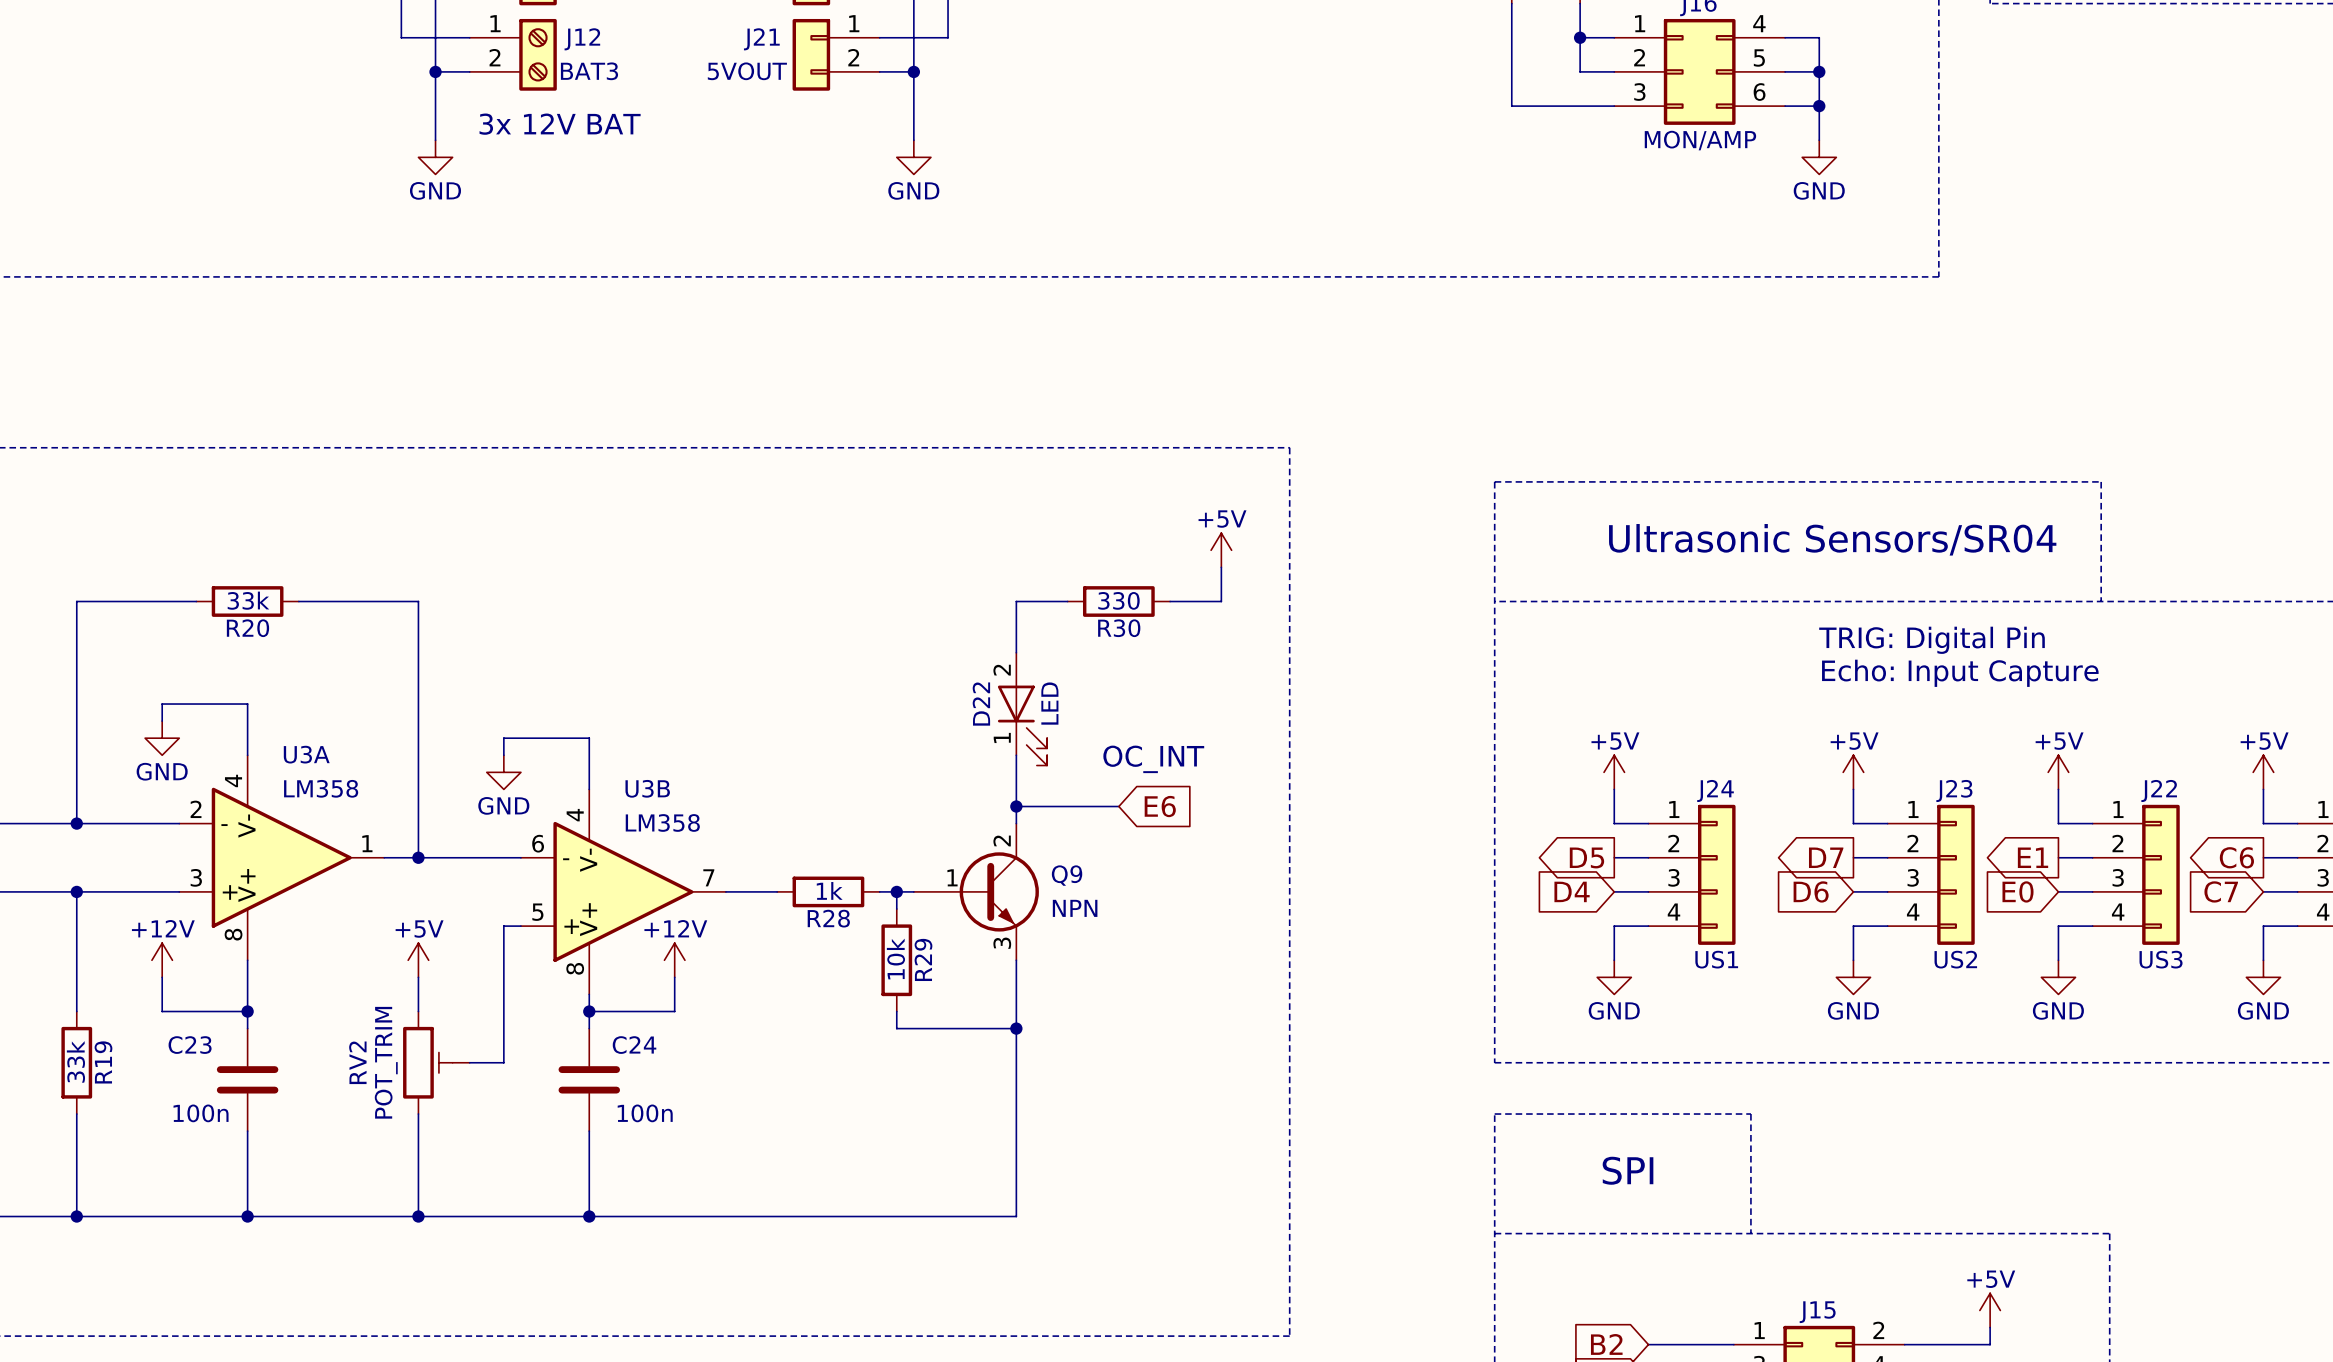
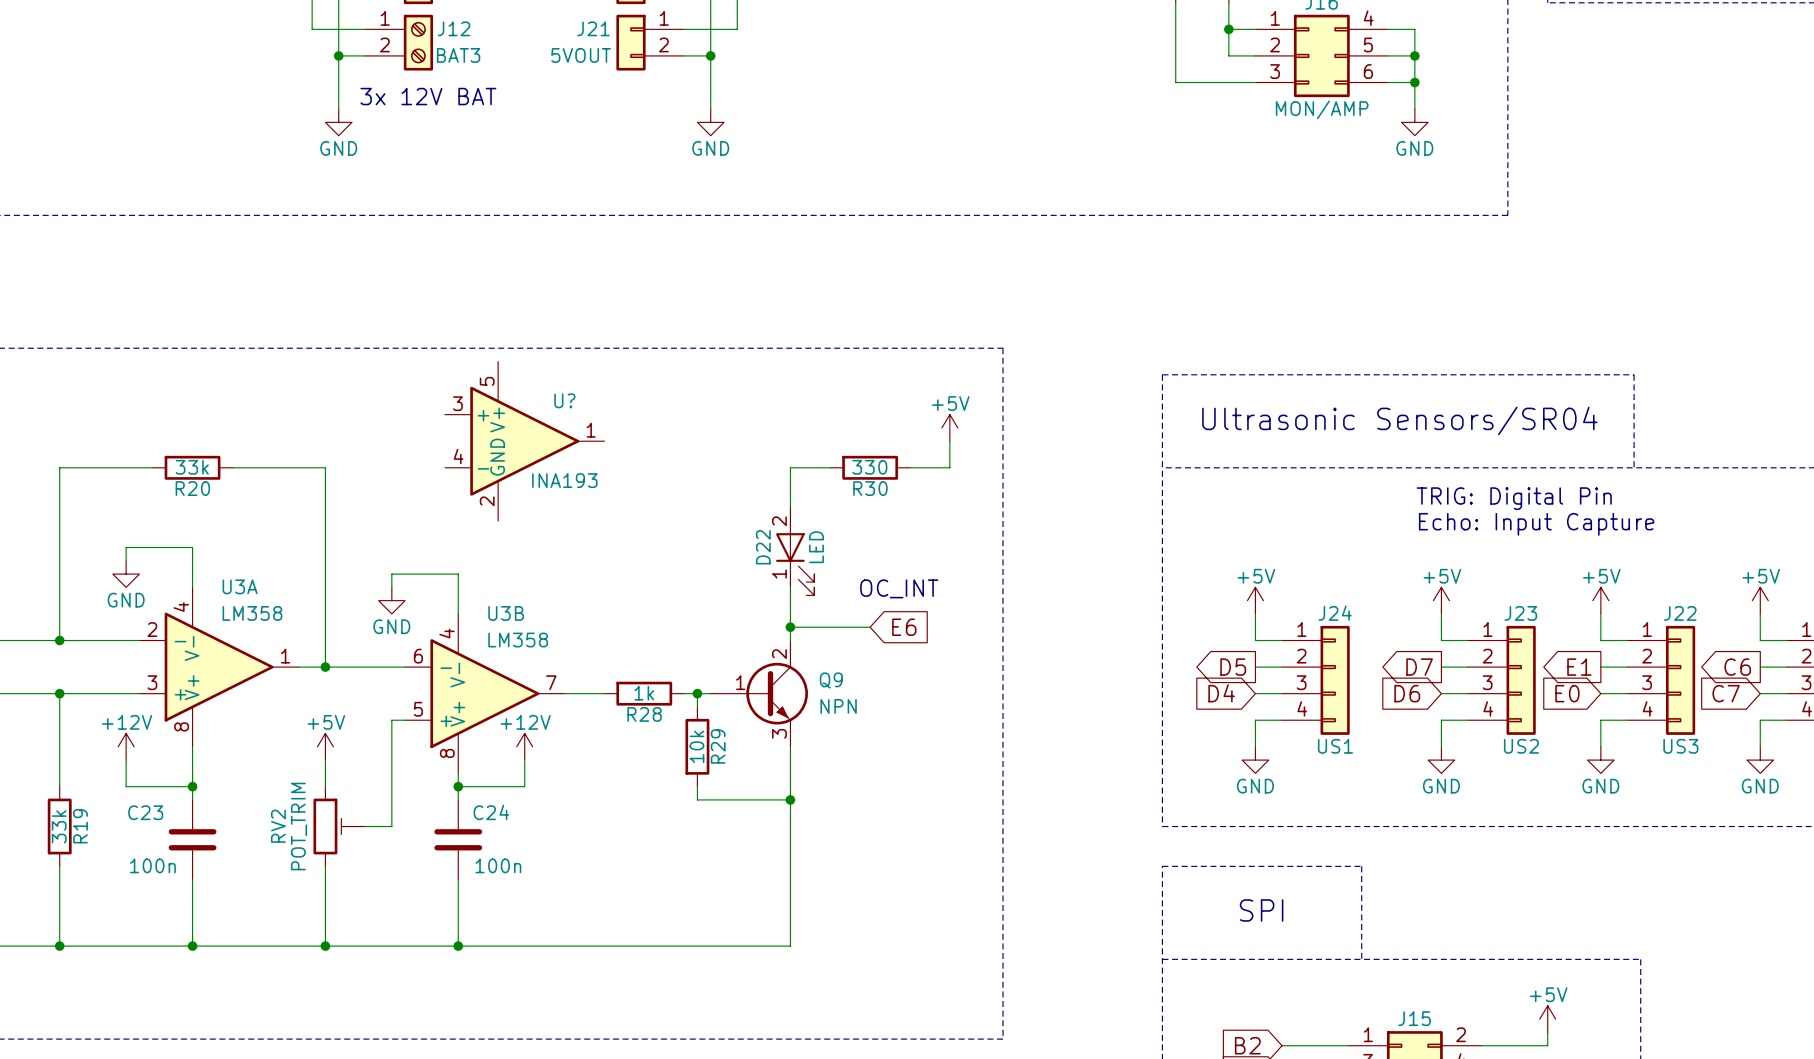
U?: none -> INA193 (524, 441)

